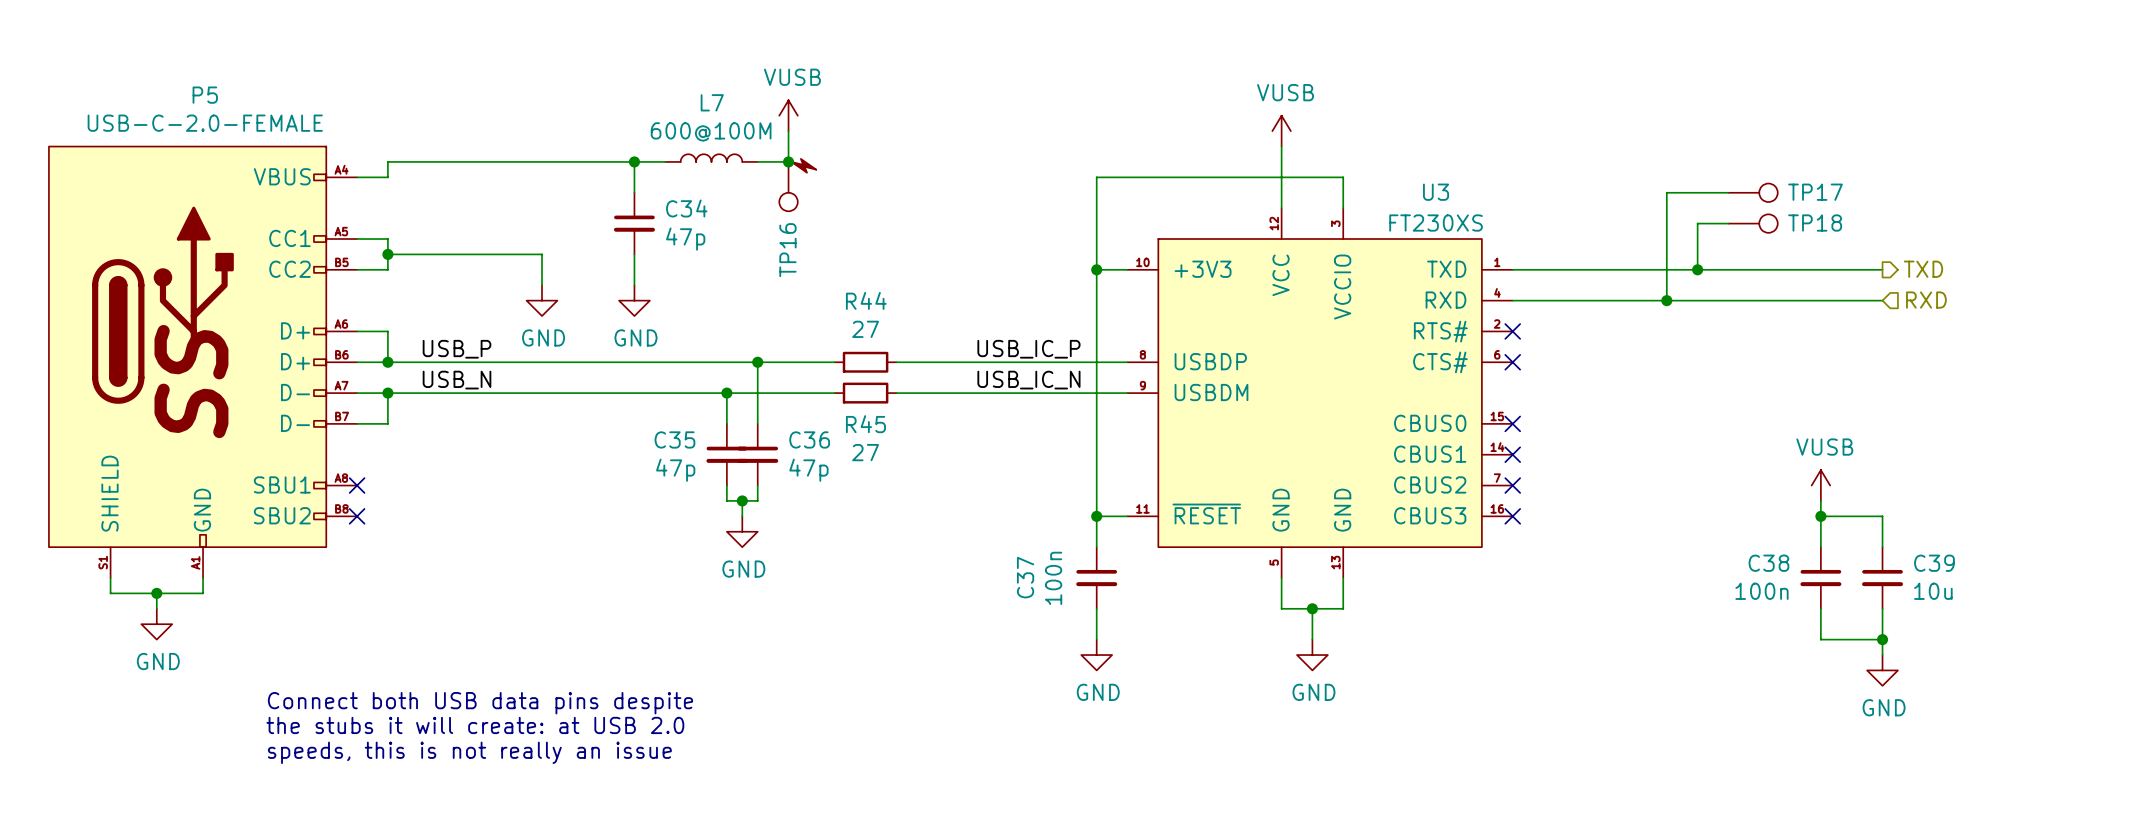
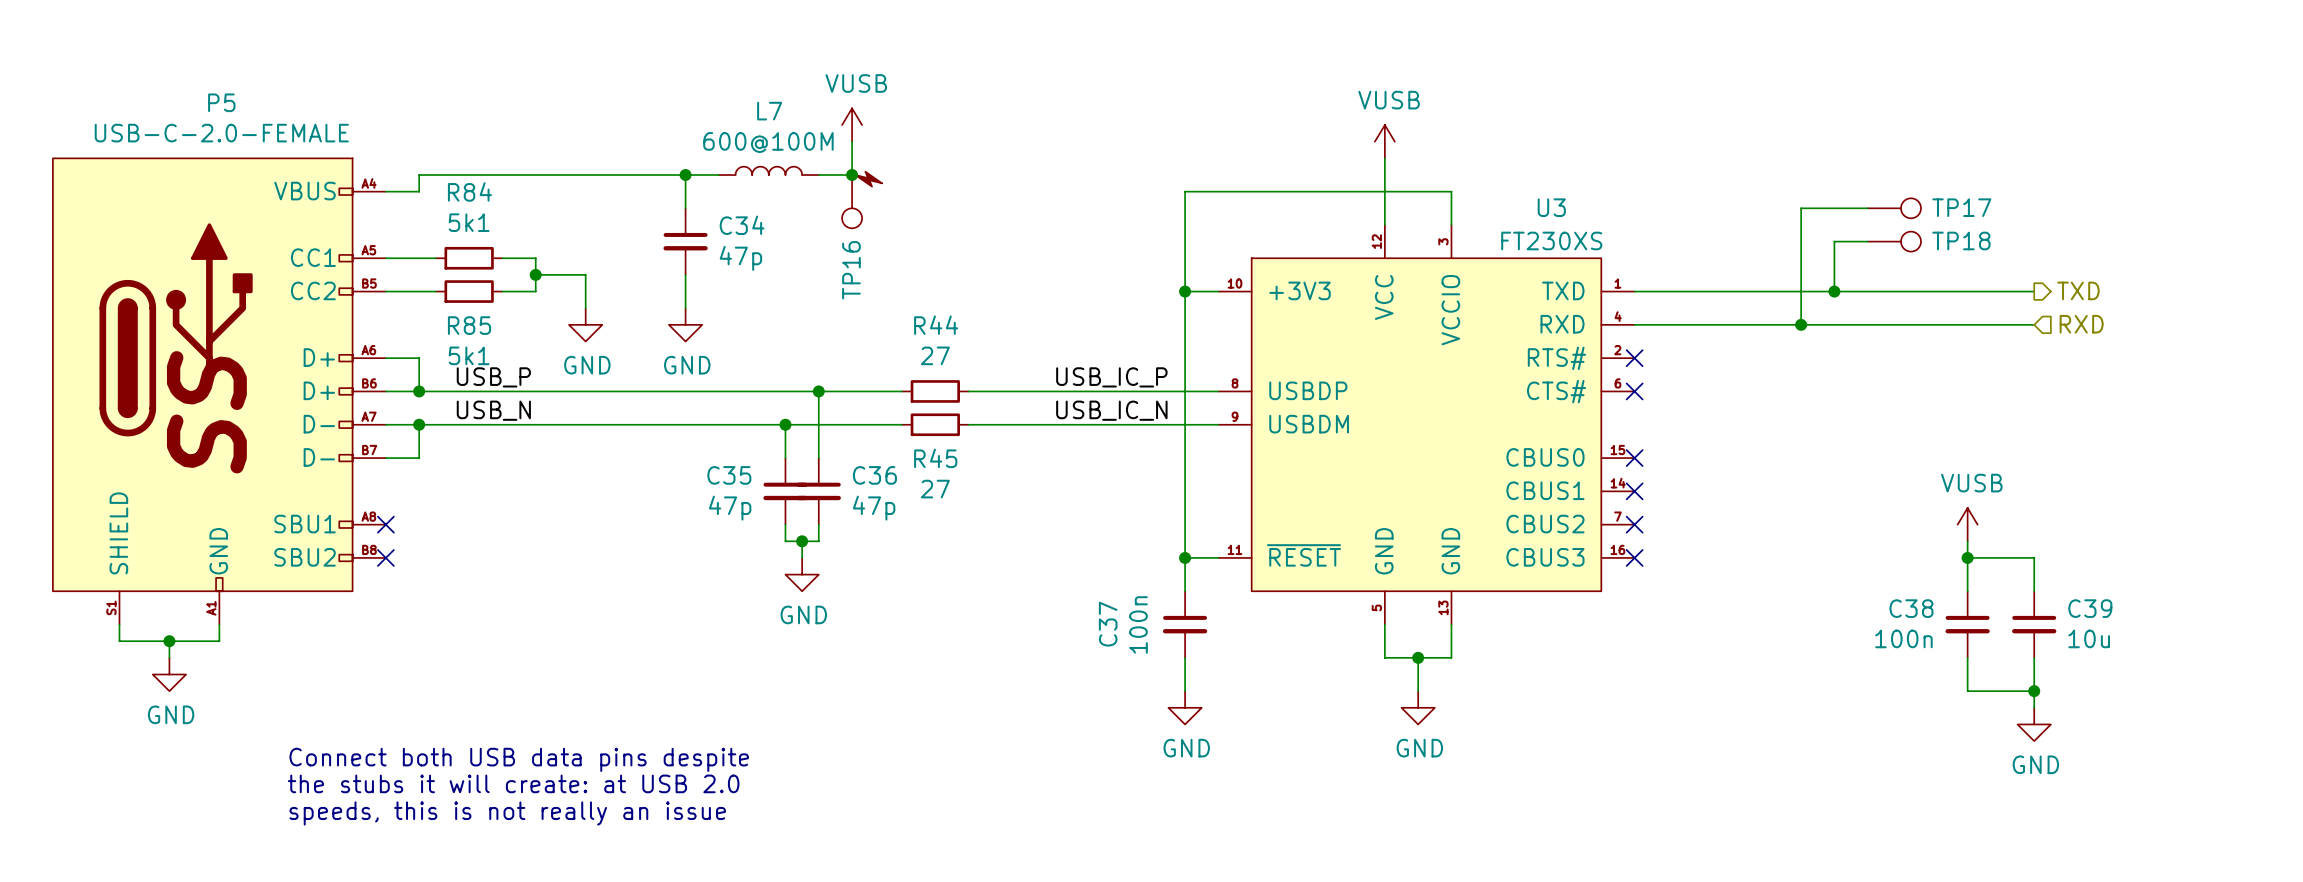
wire: (387, 239) (387, 269) -> (419, 258) (435, 258)
R84: none -> 5k1 (469, 258)
wire: none -> (502, 258) (535, 258) (535, 291) (502, 291)
wire: (387, 254) (495, 254) -> none
junction: (387, 254) -> none
junction: none -> (535, 274)
wire: none -> (419, 291) (435, 291)
R85: none -> 5k1 (469, 291)

